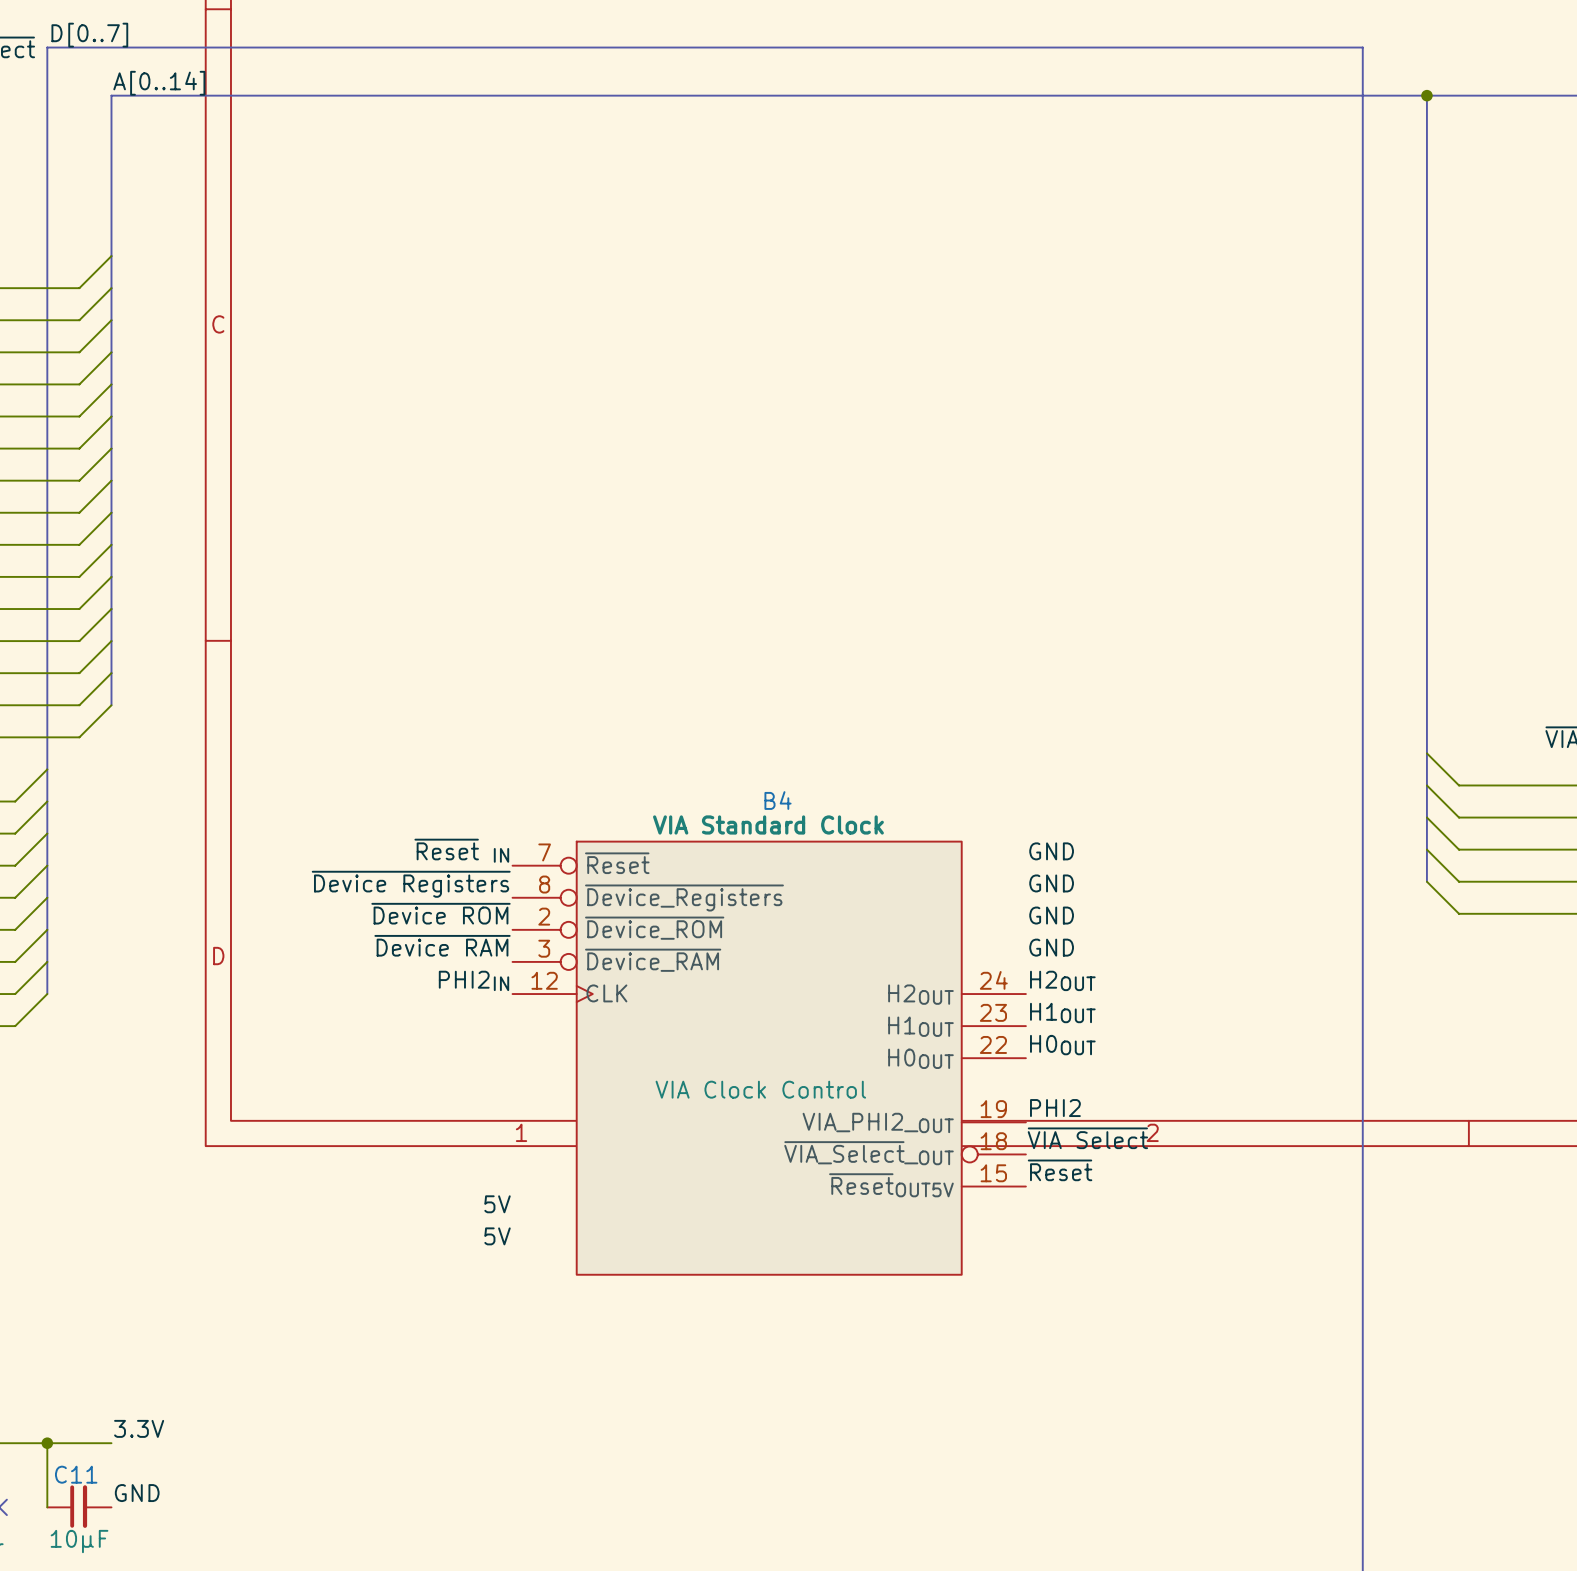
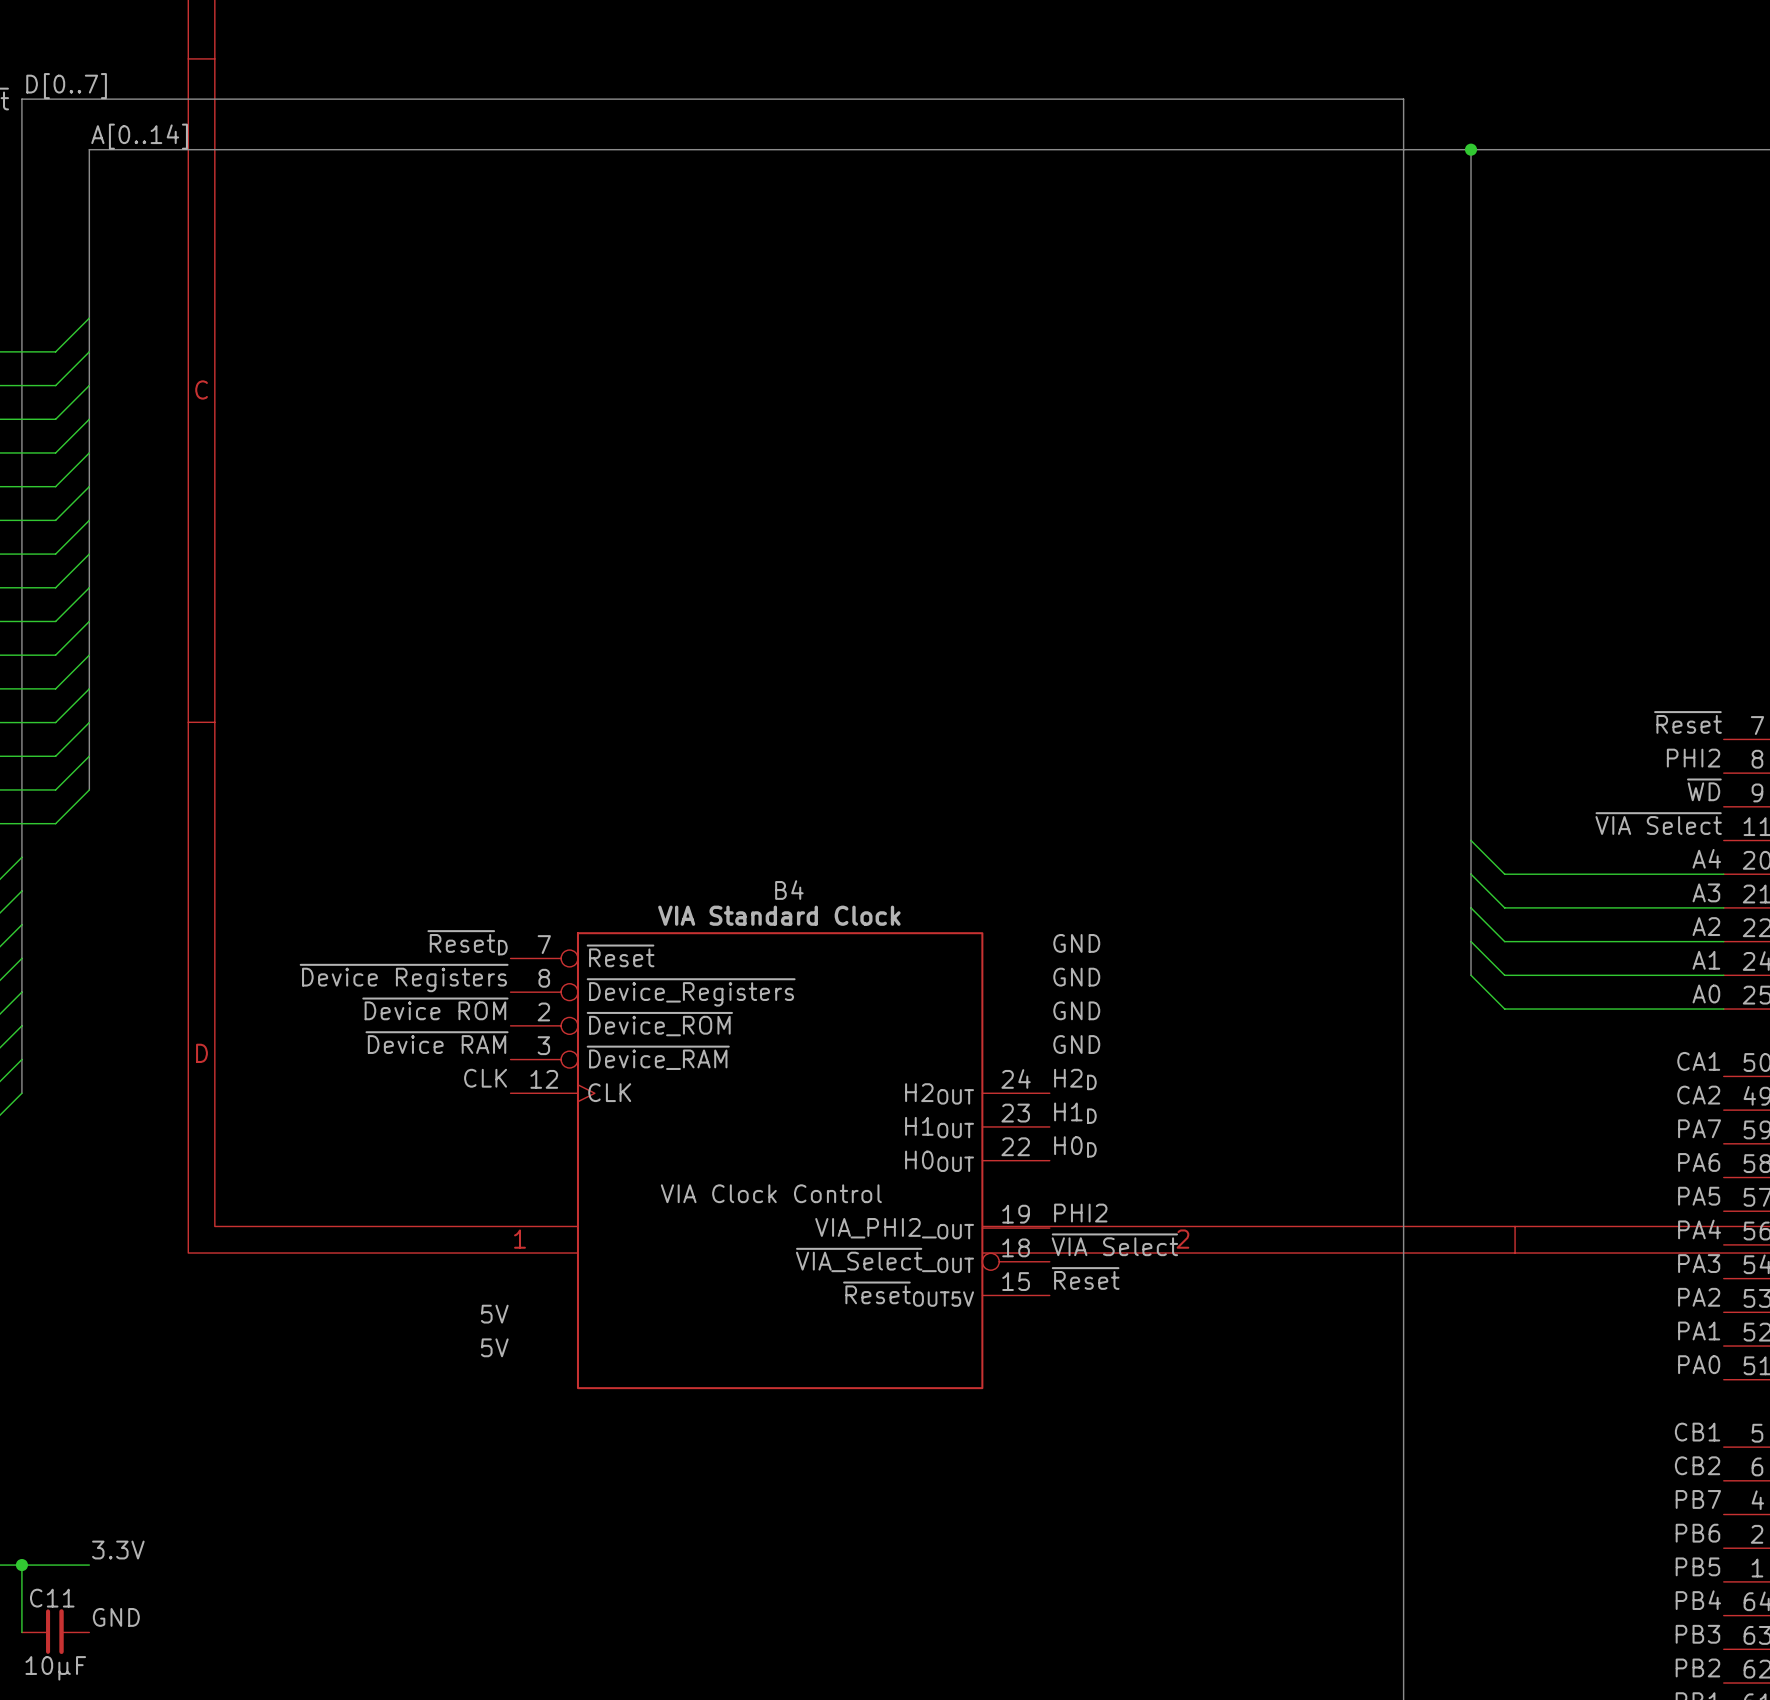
label: ~{Reset} IN (461, 850) -> ~{Reset}D (467, 942)
label: PHI2IN (474, 980) -> CLK (485, 1078)
label: H2OUT (1062, 980) -> H2D (1075, 1079)
label: H1OUT (1062, 1012) -> H1D (1075, 1113)
label: H0OUT (1062, 1045) -> H0D (1075, 1146)

